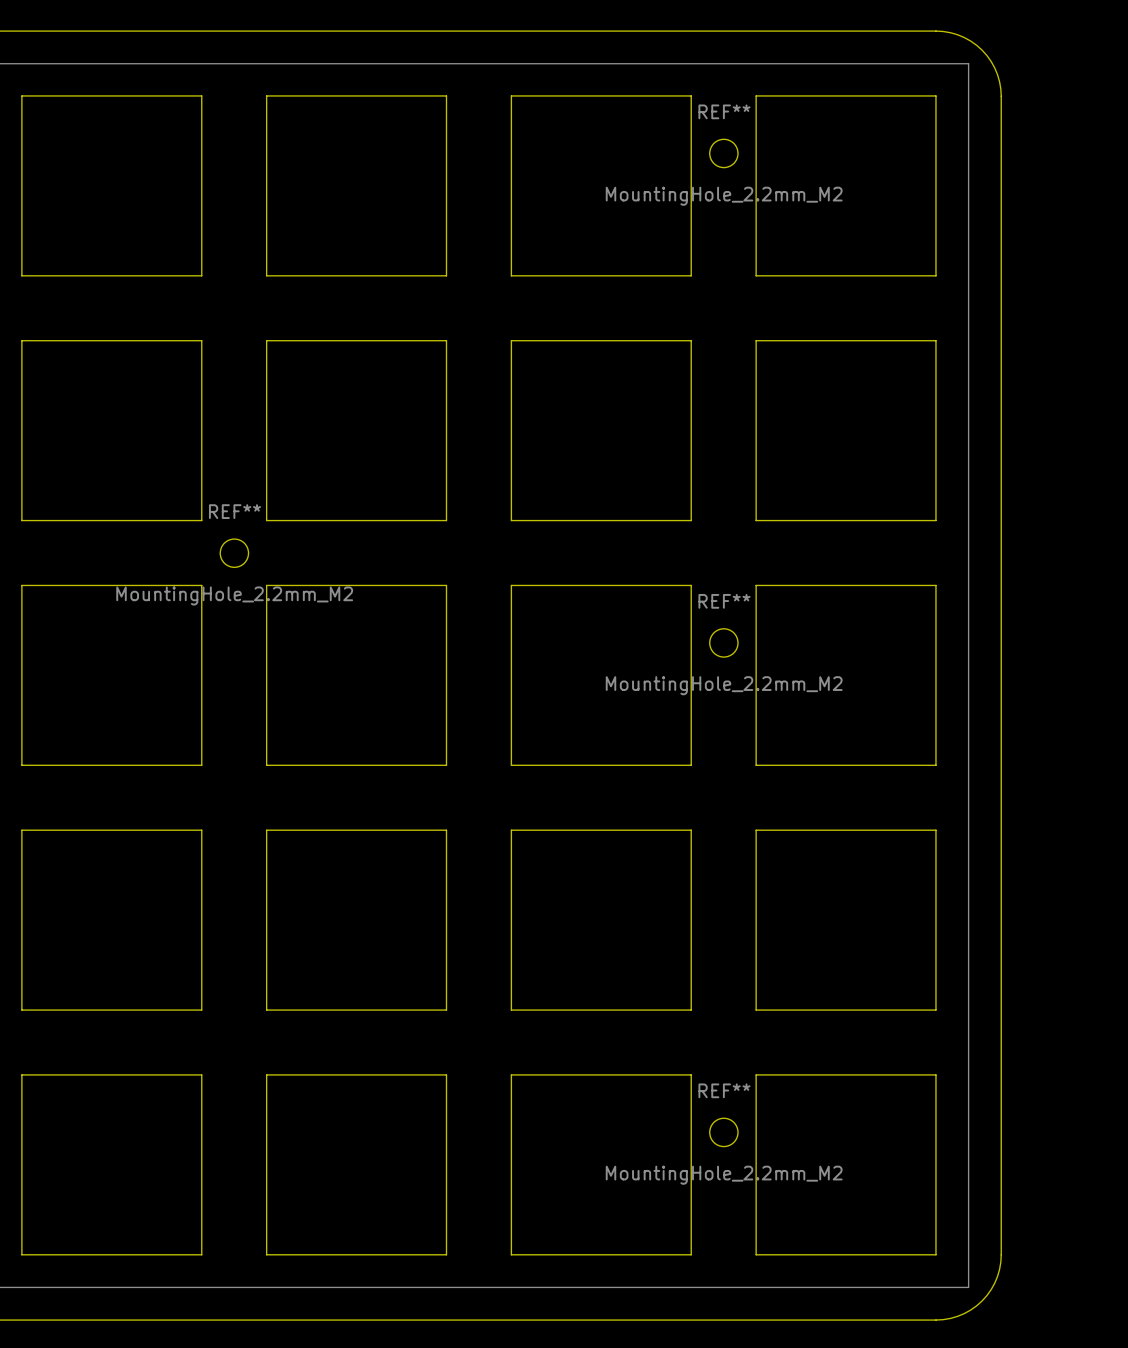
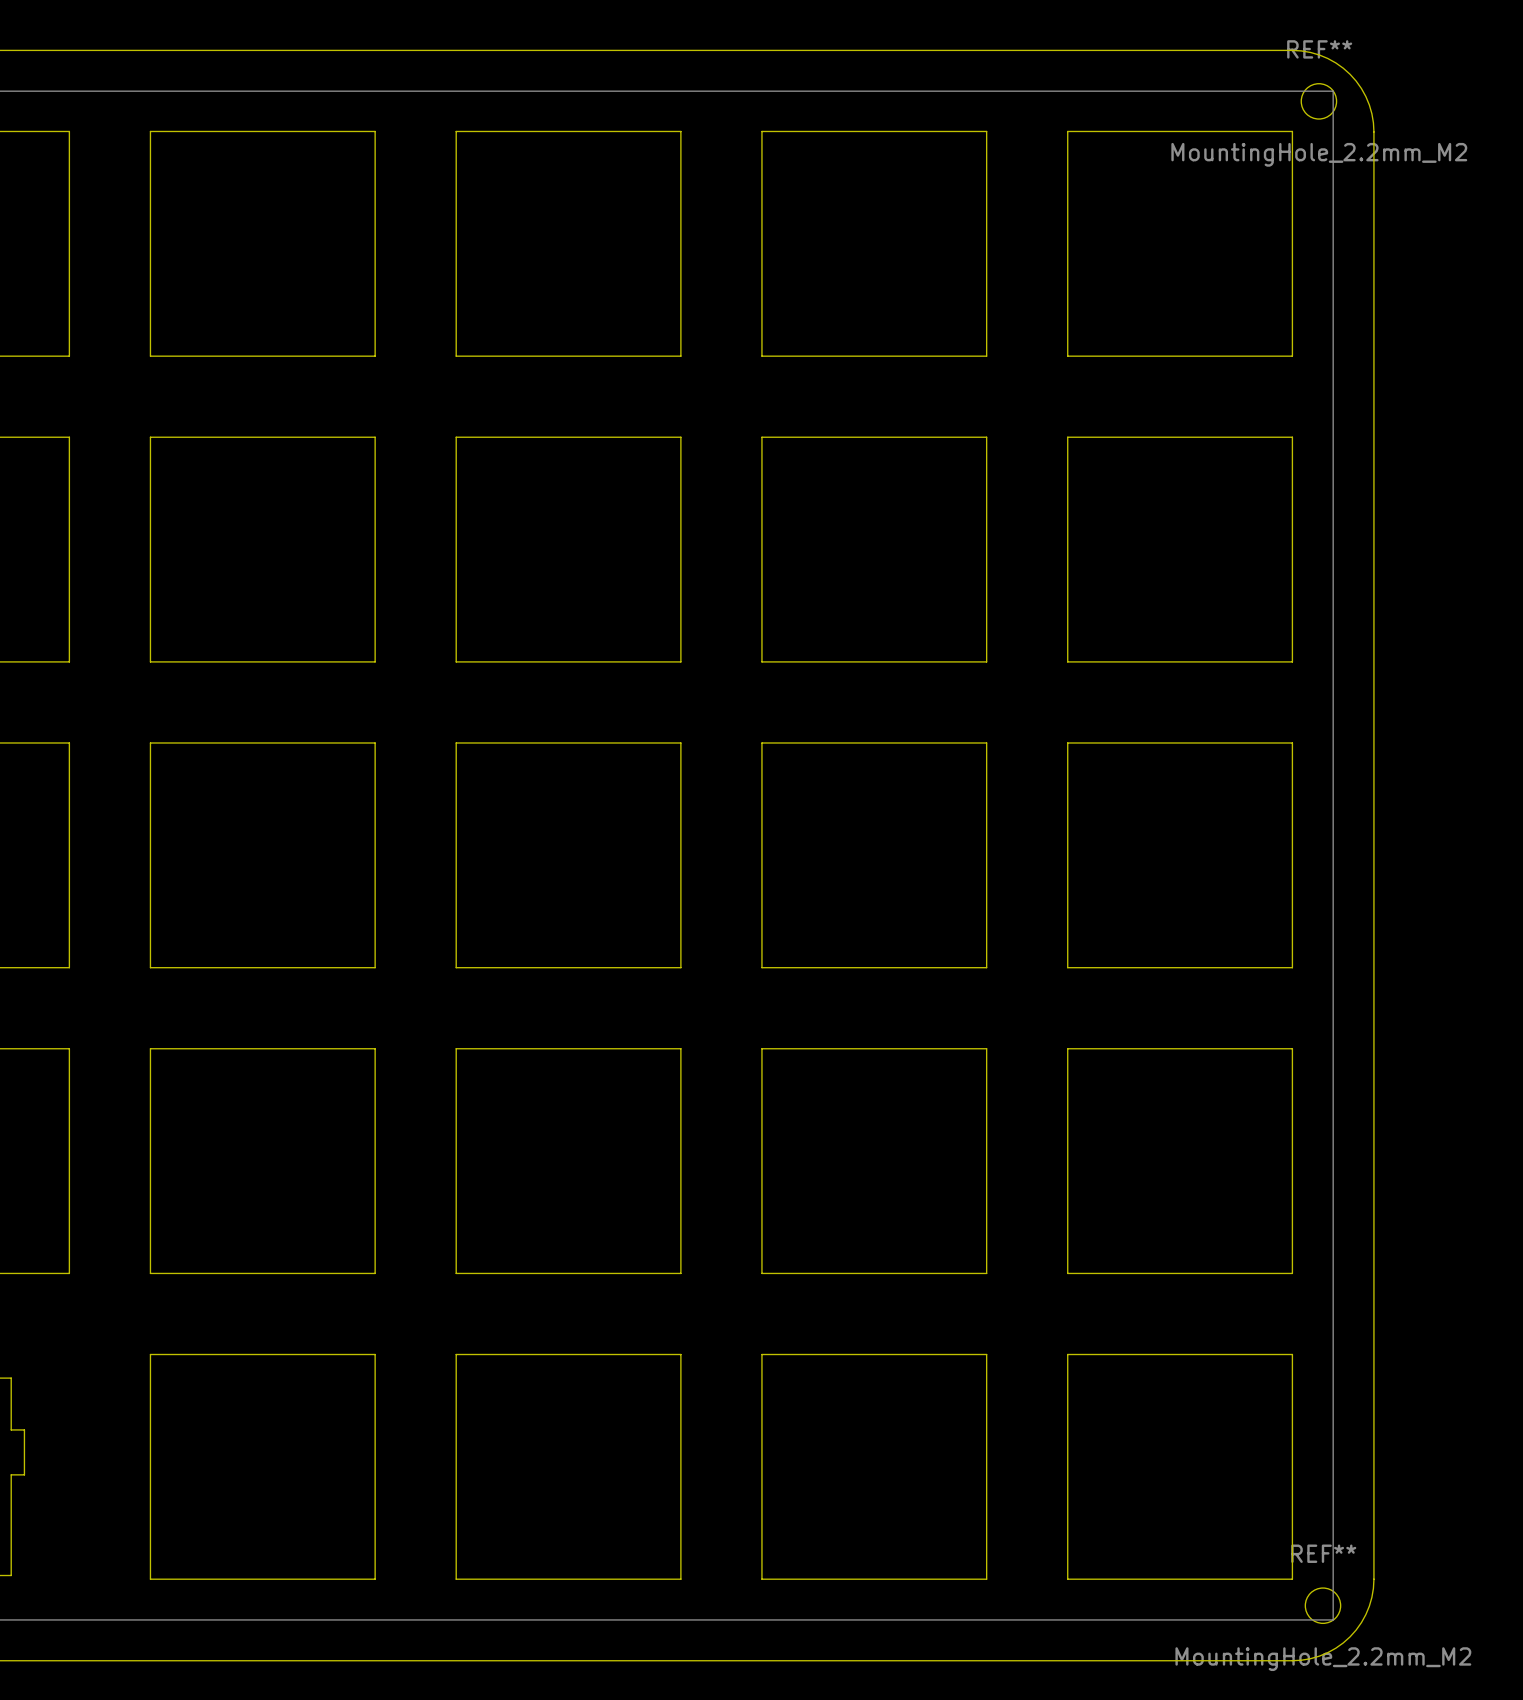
REF** position: (723, 153) -> (1318, 101)
REF**: MountingHole_2.2mm_M2 (234, 553) -> none
REF**: MountingHole_2.2mm_M2 (723, 642) -> none
REF** position: (723, 1132) -> (1322, 1605)

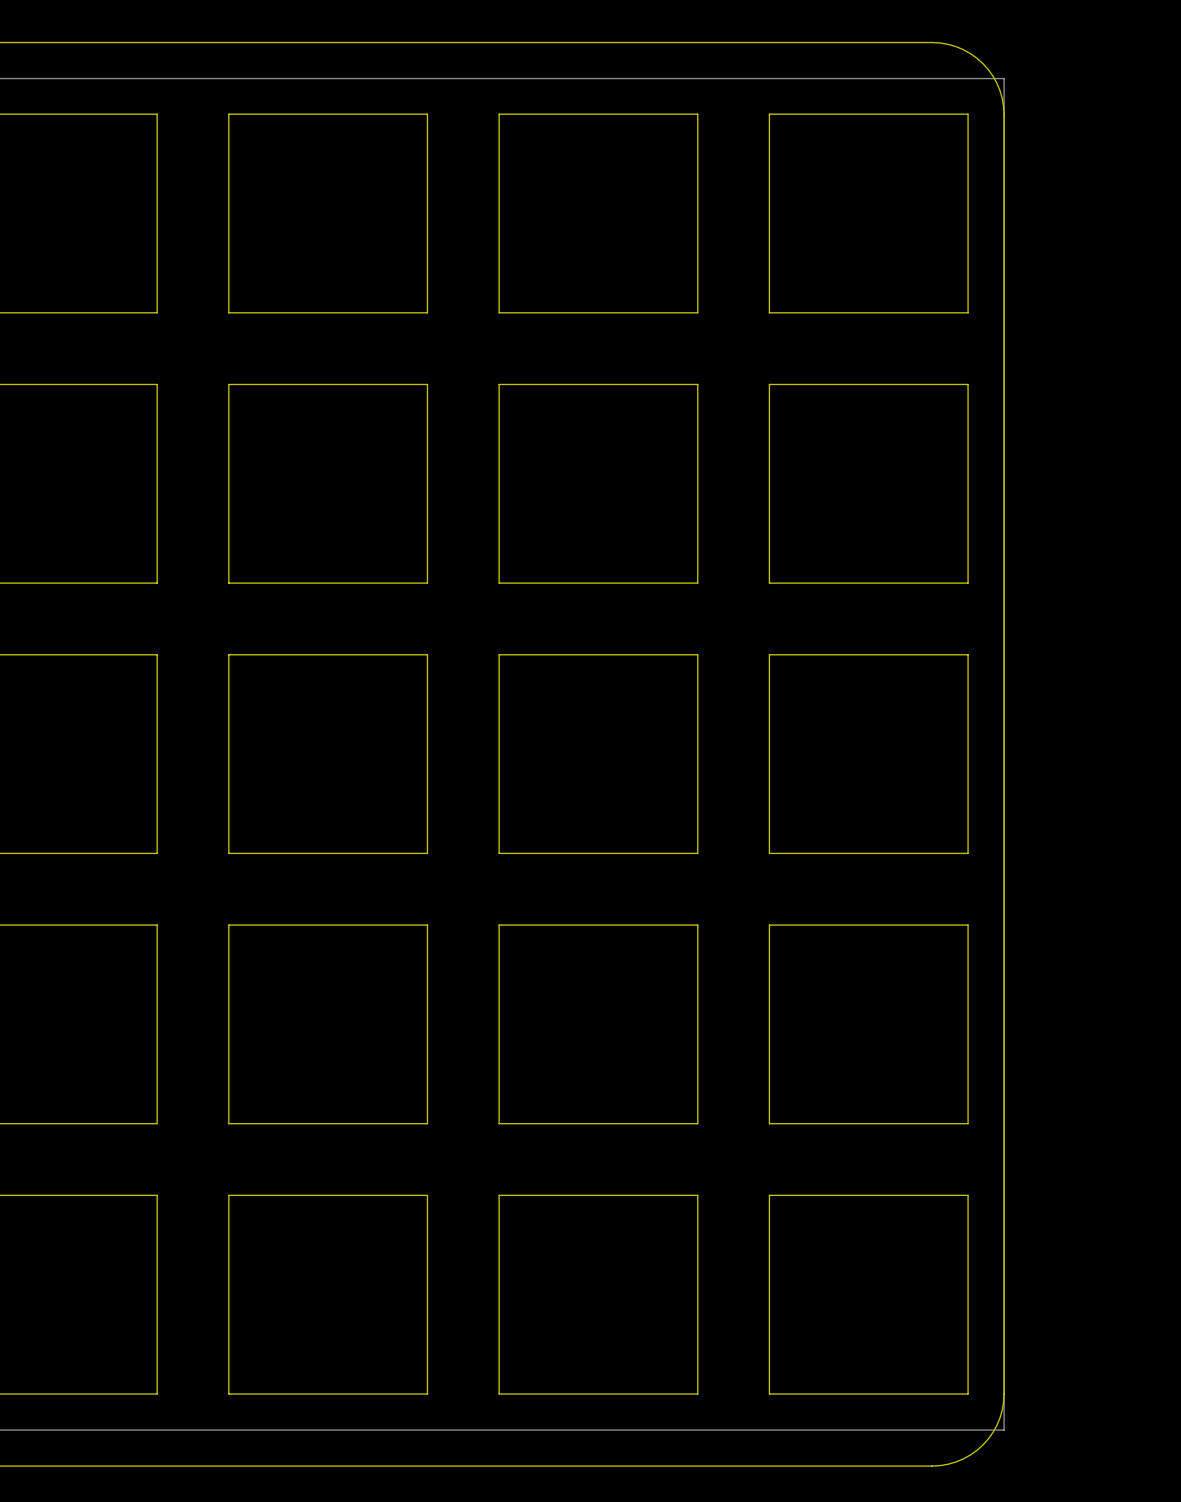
board edge: (1251, 50) (1301, 50) (1319, 54) (1335, 62) (1350, 74) (1361, 88) (1371, 113) (1373, 131) (1373, 1588) (1369, 1606) (1361, 1622) (1350, 1636) (1335, 1648) (1319, 1656) (1301, 1660) (1251, 1660) -> (932, 42) (955, 46) (970, 53) (982, 63) (996, 83) (1002, 98) (1004, 114) (1004, 1394) (1002, 1410) (996, 1425) (982, 1444) (970, 1455) (955, 1462) (932, 1466)
REF**: MountingHole_2.2mm_M2 (1318, 101) -> none
REF**: MountingHole_2.2mm_M2 (1322, 1605) -> none

